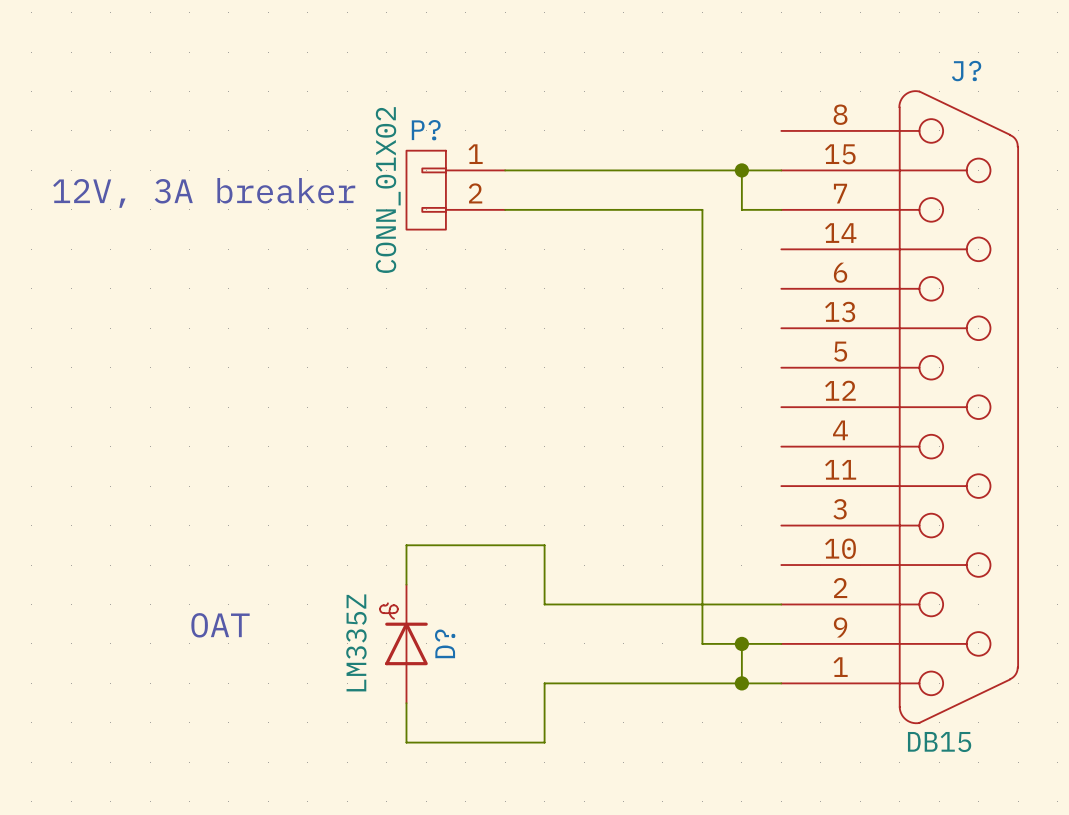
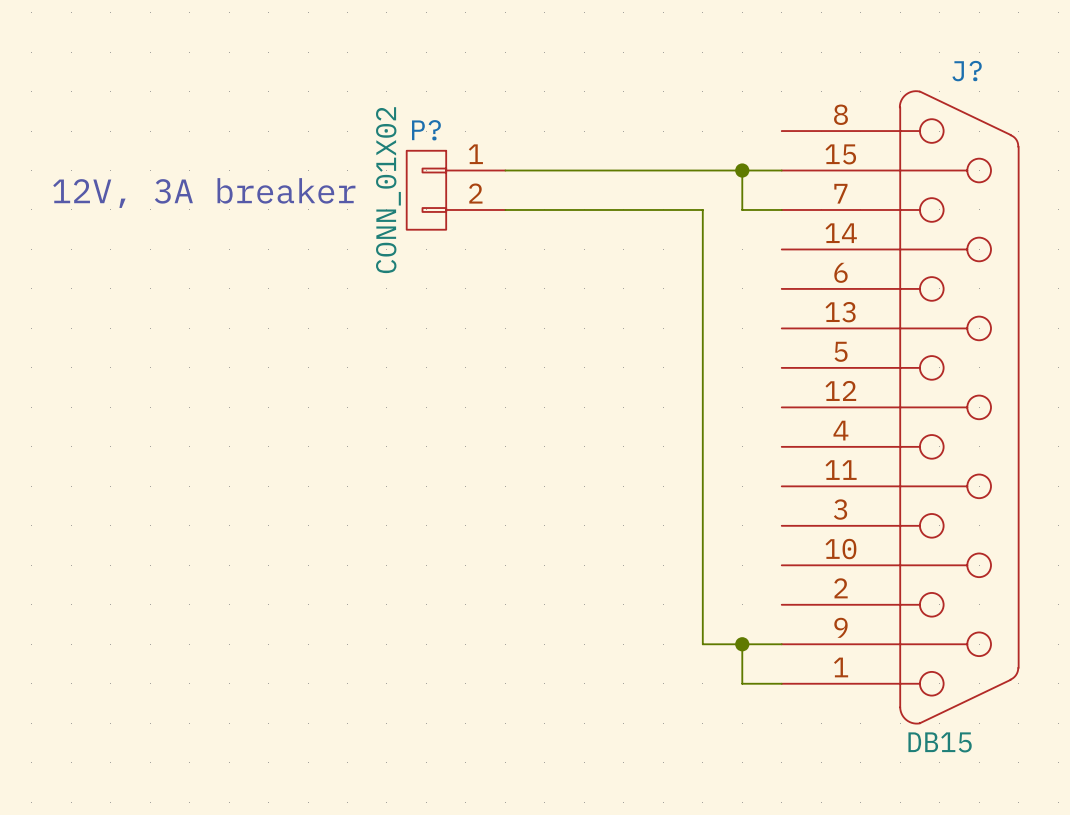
wire: (406, 584) (406, 545) (544, 545) (544, 604) (781, 604) -> none
text: OAT (220, 625) -> none
D?: LM335Z (403, 643) -> none
wire: (741, 683) (544, 683) (544, 742) (406, 742) (406, 703) -> none
junction: (741, 683) -> none

